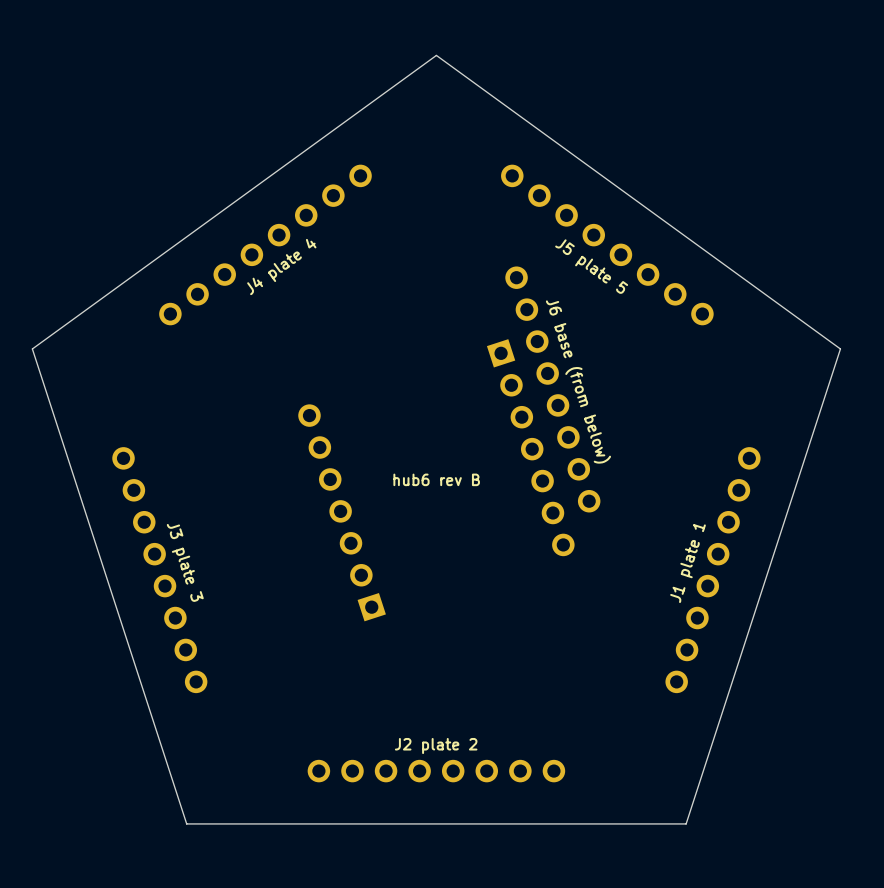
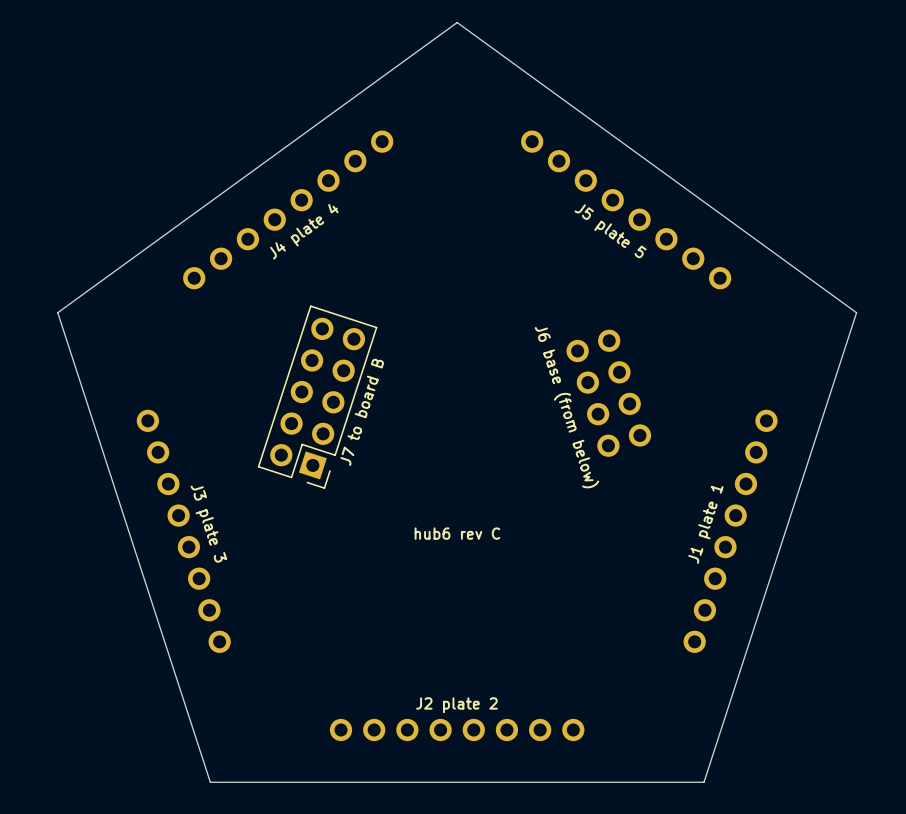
text position: J6 base (from below) (578, 382) -> J6 base (from below) (567, 407)
part: (552, 389) -> none
part: none -> (608, 393)
part: none -> (317, 397)
part: (530, 447) -> none
text: none -> J7 to board B (362, 412)
text: hub6 rev B (436, 479) -> none
part: (342, 512) -> none
text: none -> hub6 rev C (457, 533)

